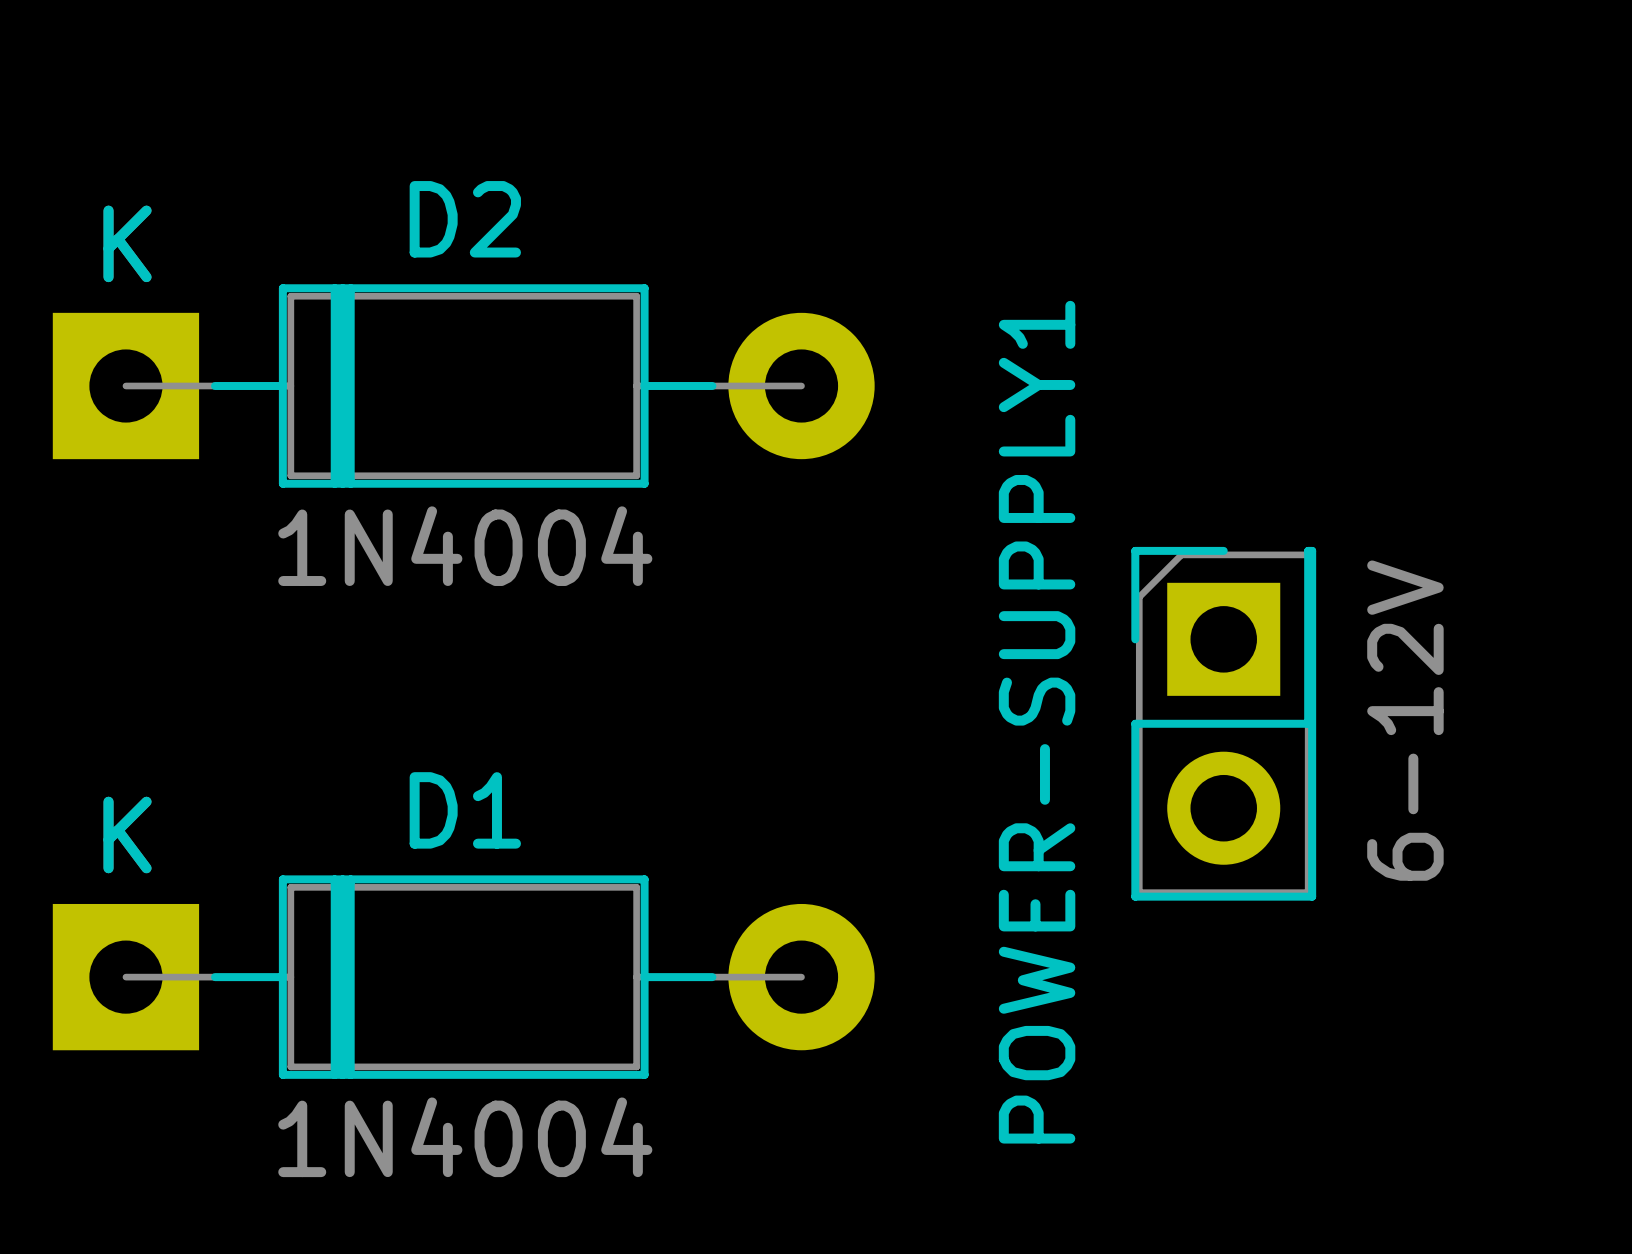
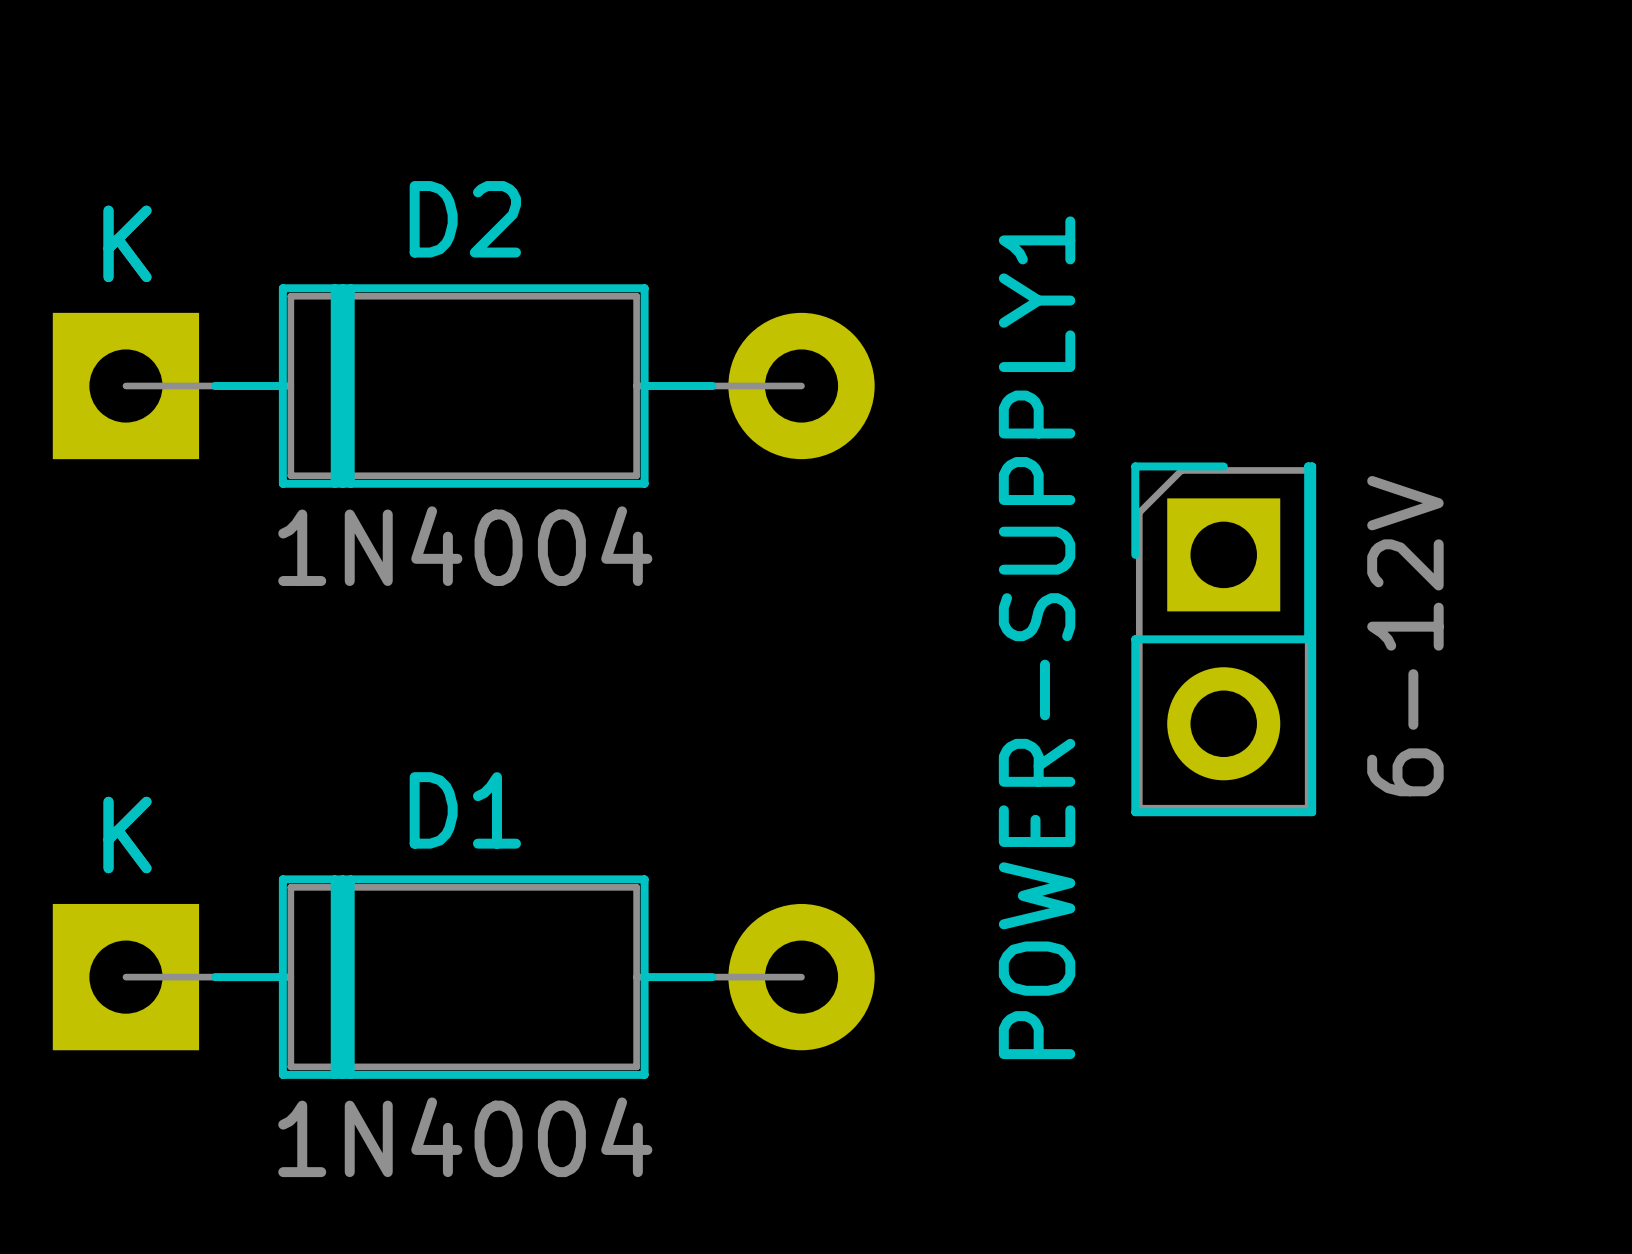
POWER-SUPPLY1 position: (1223, 723) -> (1223, 639)

